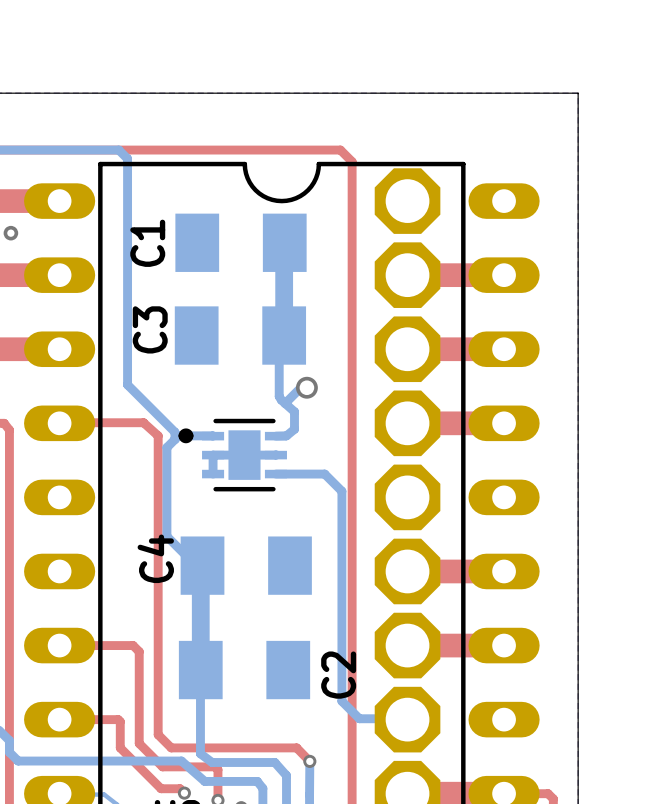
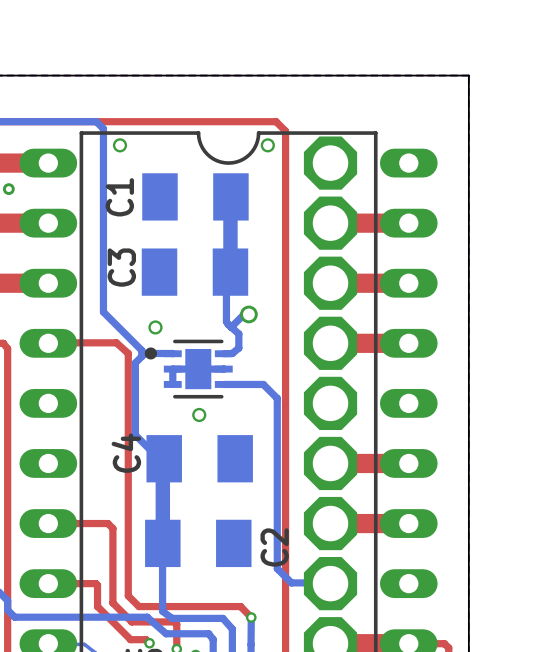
via: none -> (120, 145)
via: none -> (267, 145)
via: none -> (155, 327)
via: none -> (199, 414)

